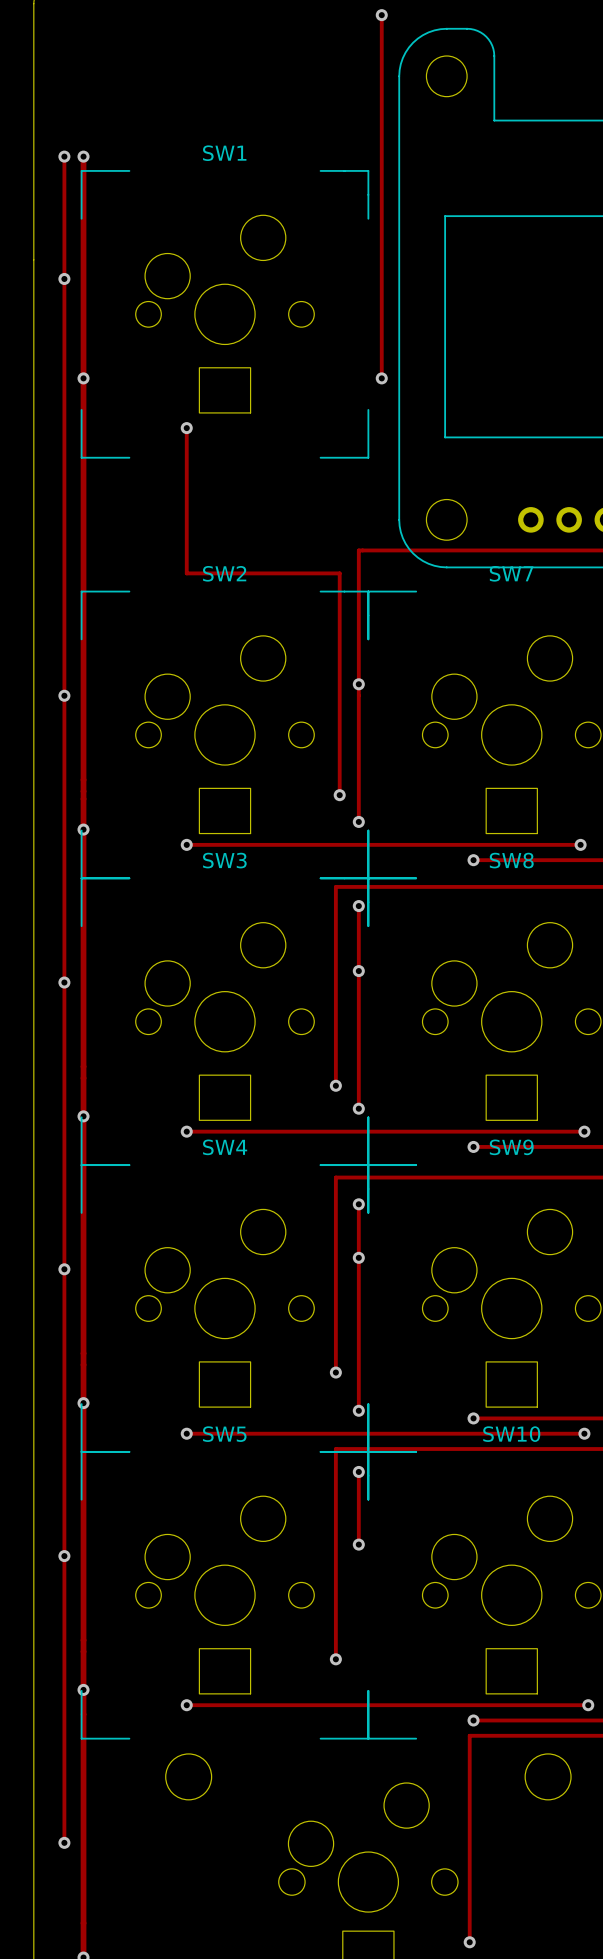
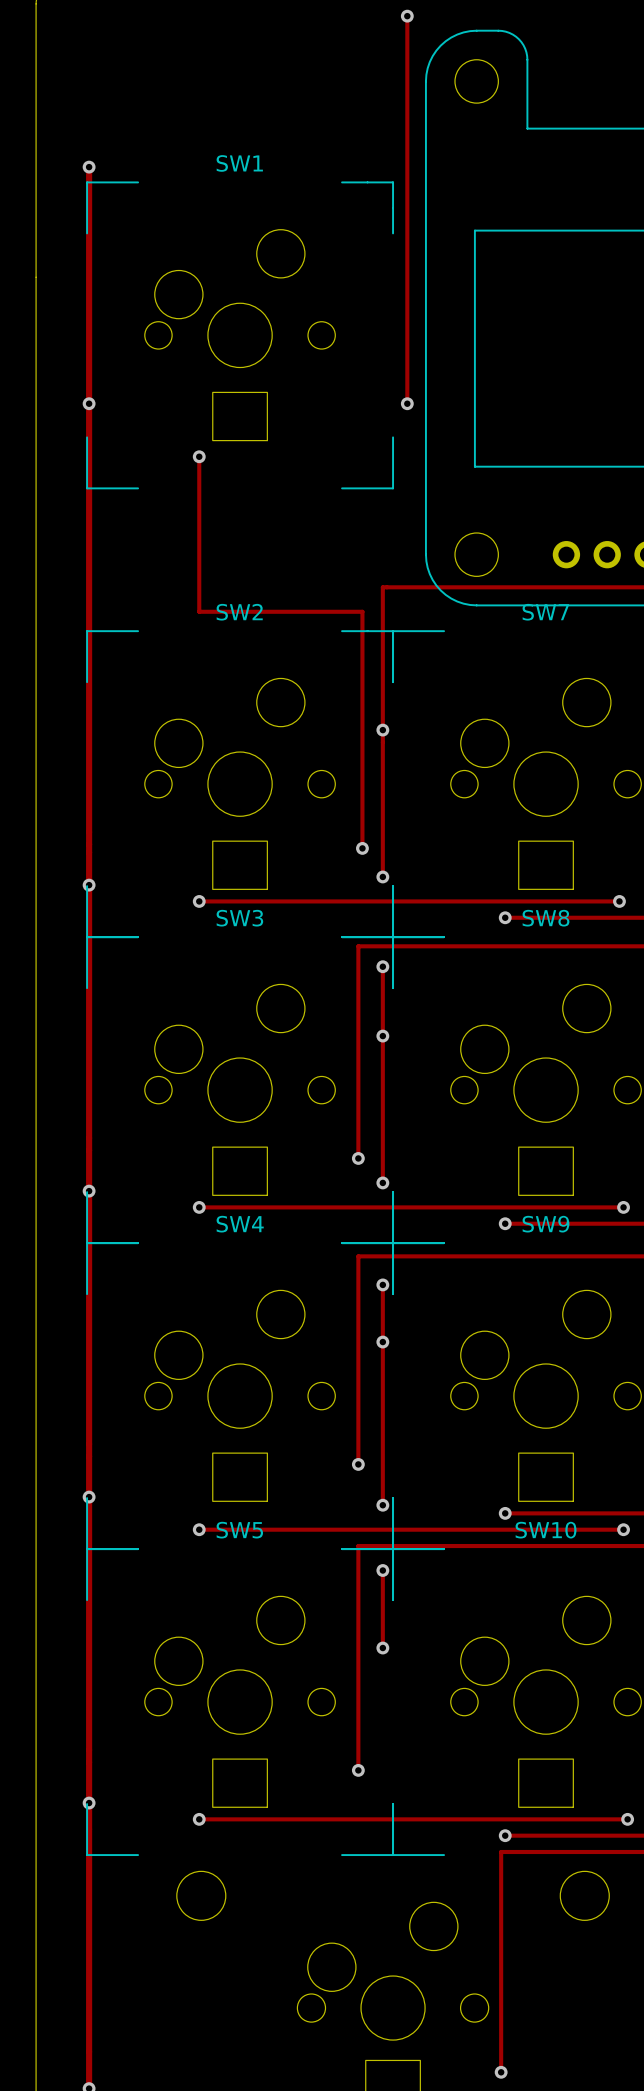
track: (64, 156) (64, 1842) -> none
via: (64, 156) -> none
via: (64, 278) -> none
via: (64, 695) -> none
via: (64, 982) -> none
via: (64, 1269) -> none
via: (64, 1556) -> none
via: (64, 1842) -> none

